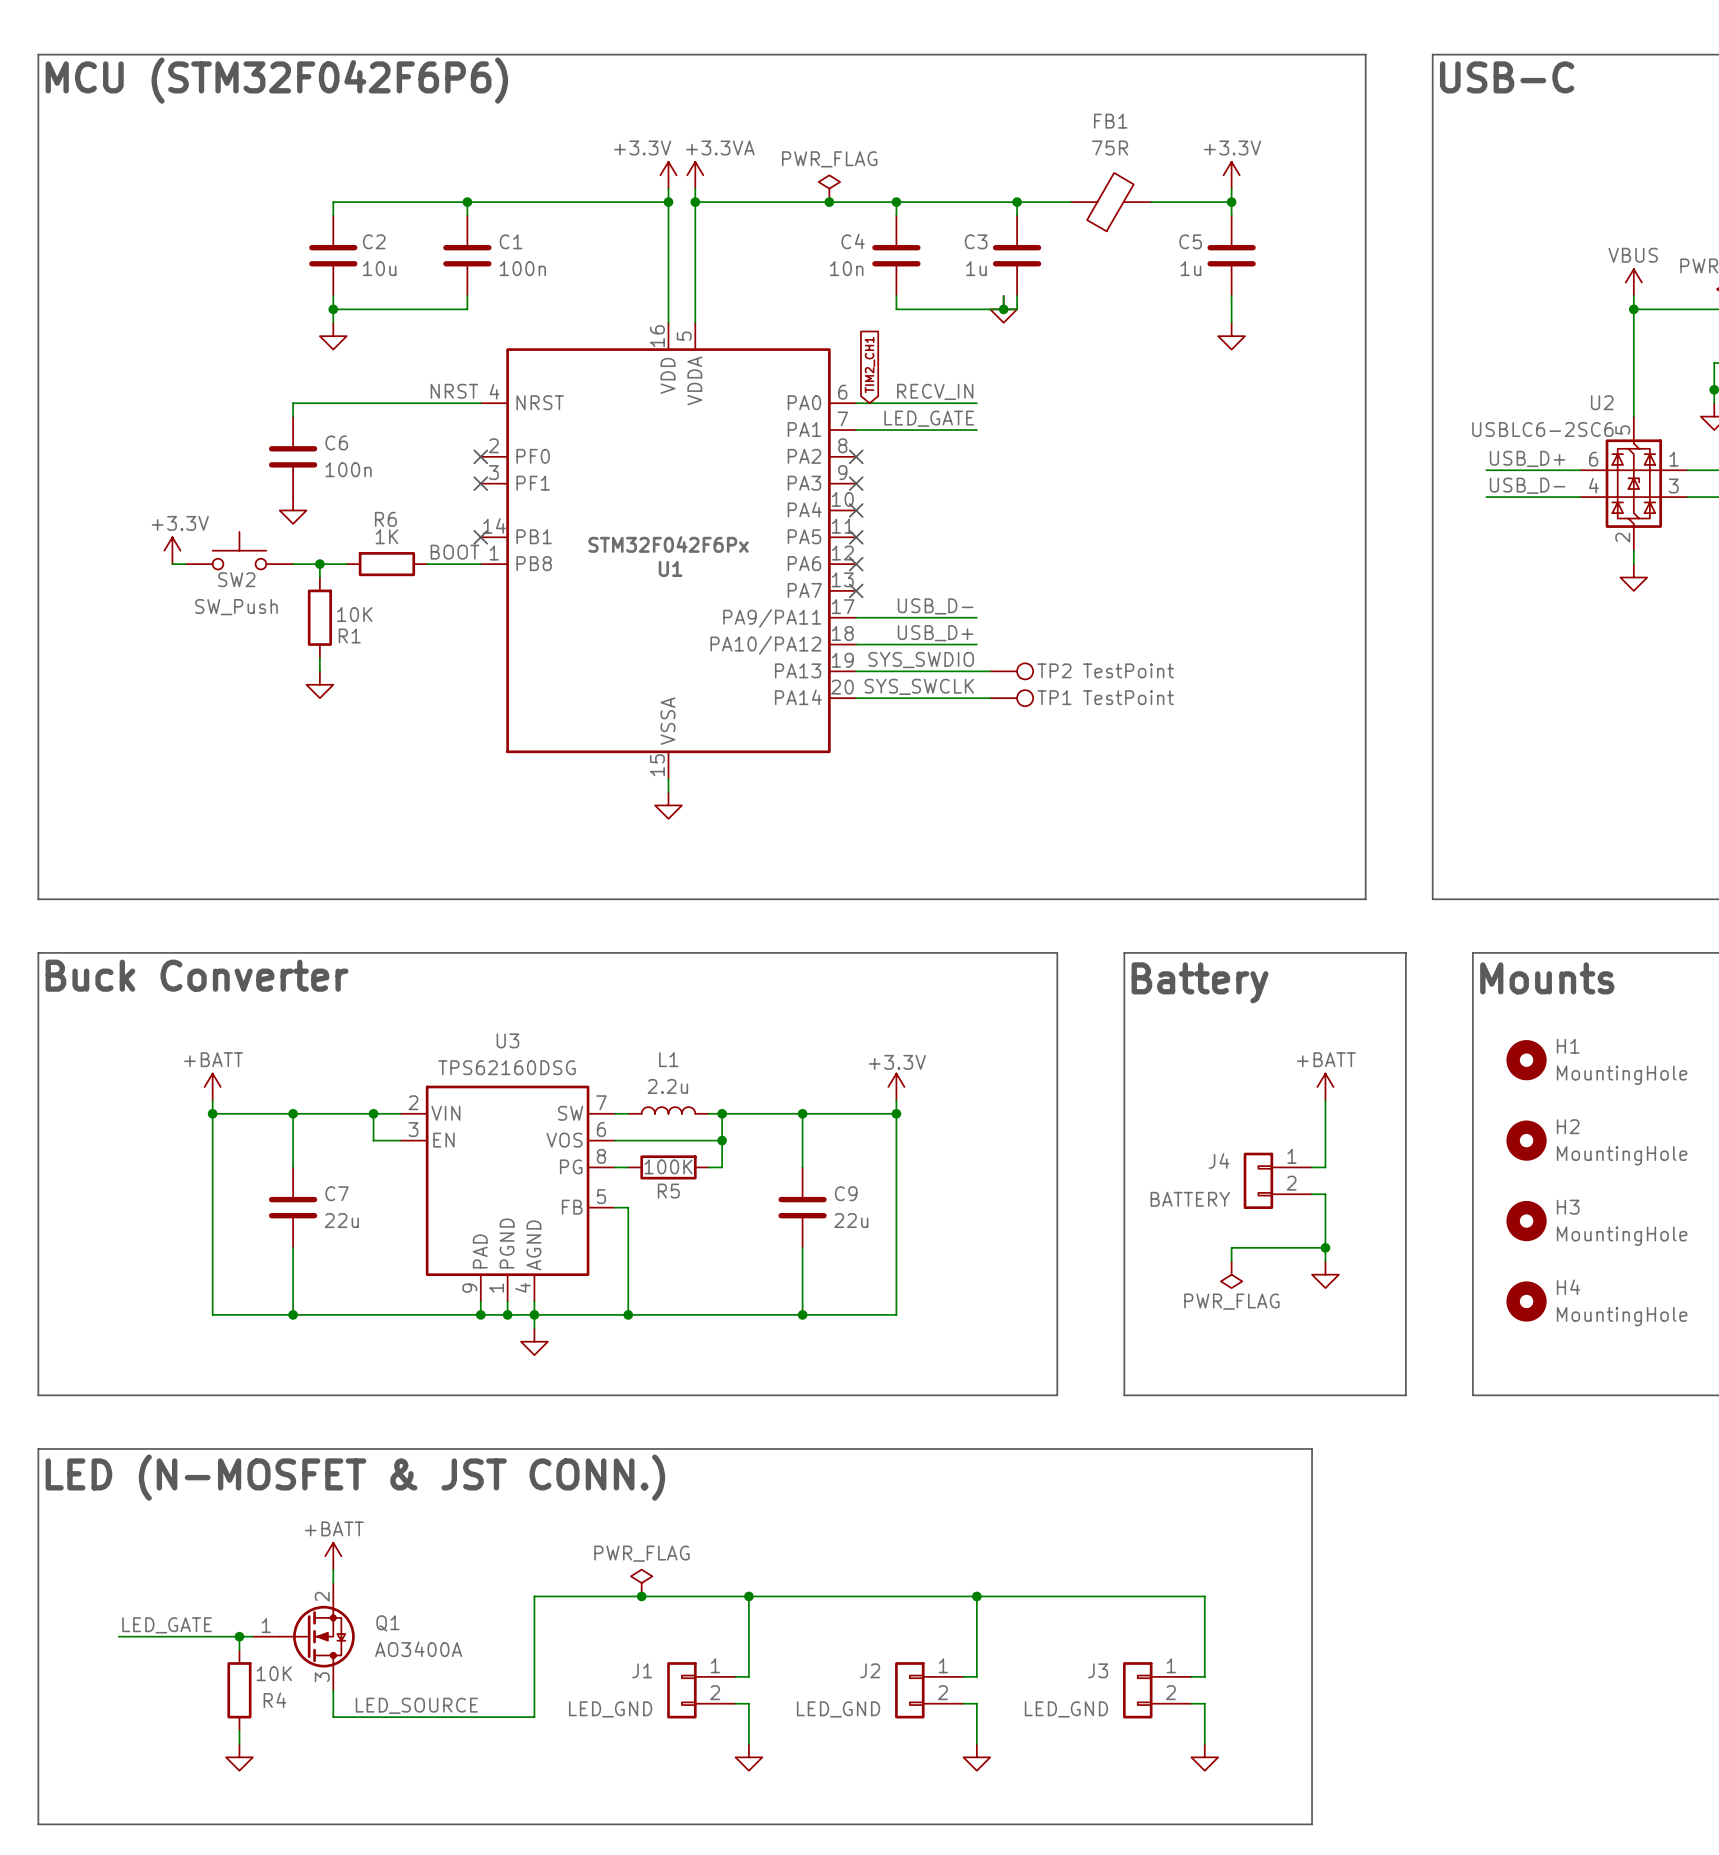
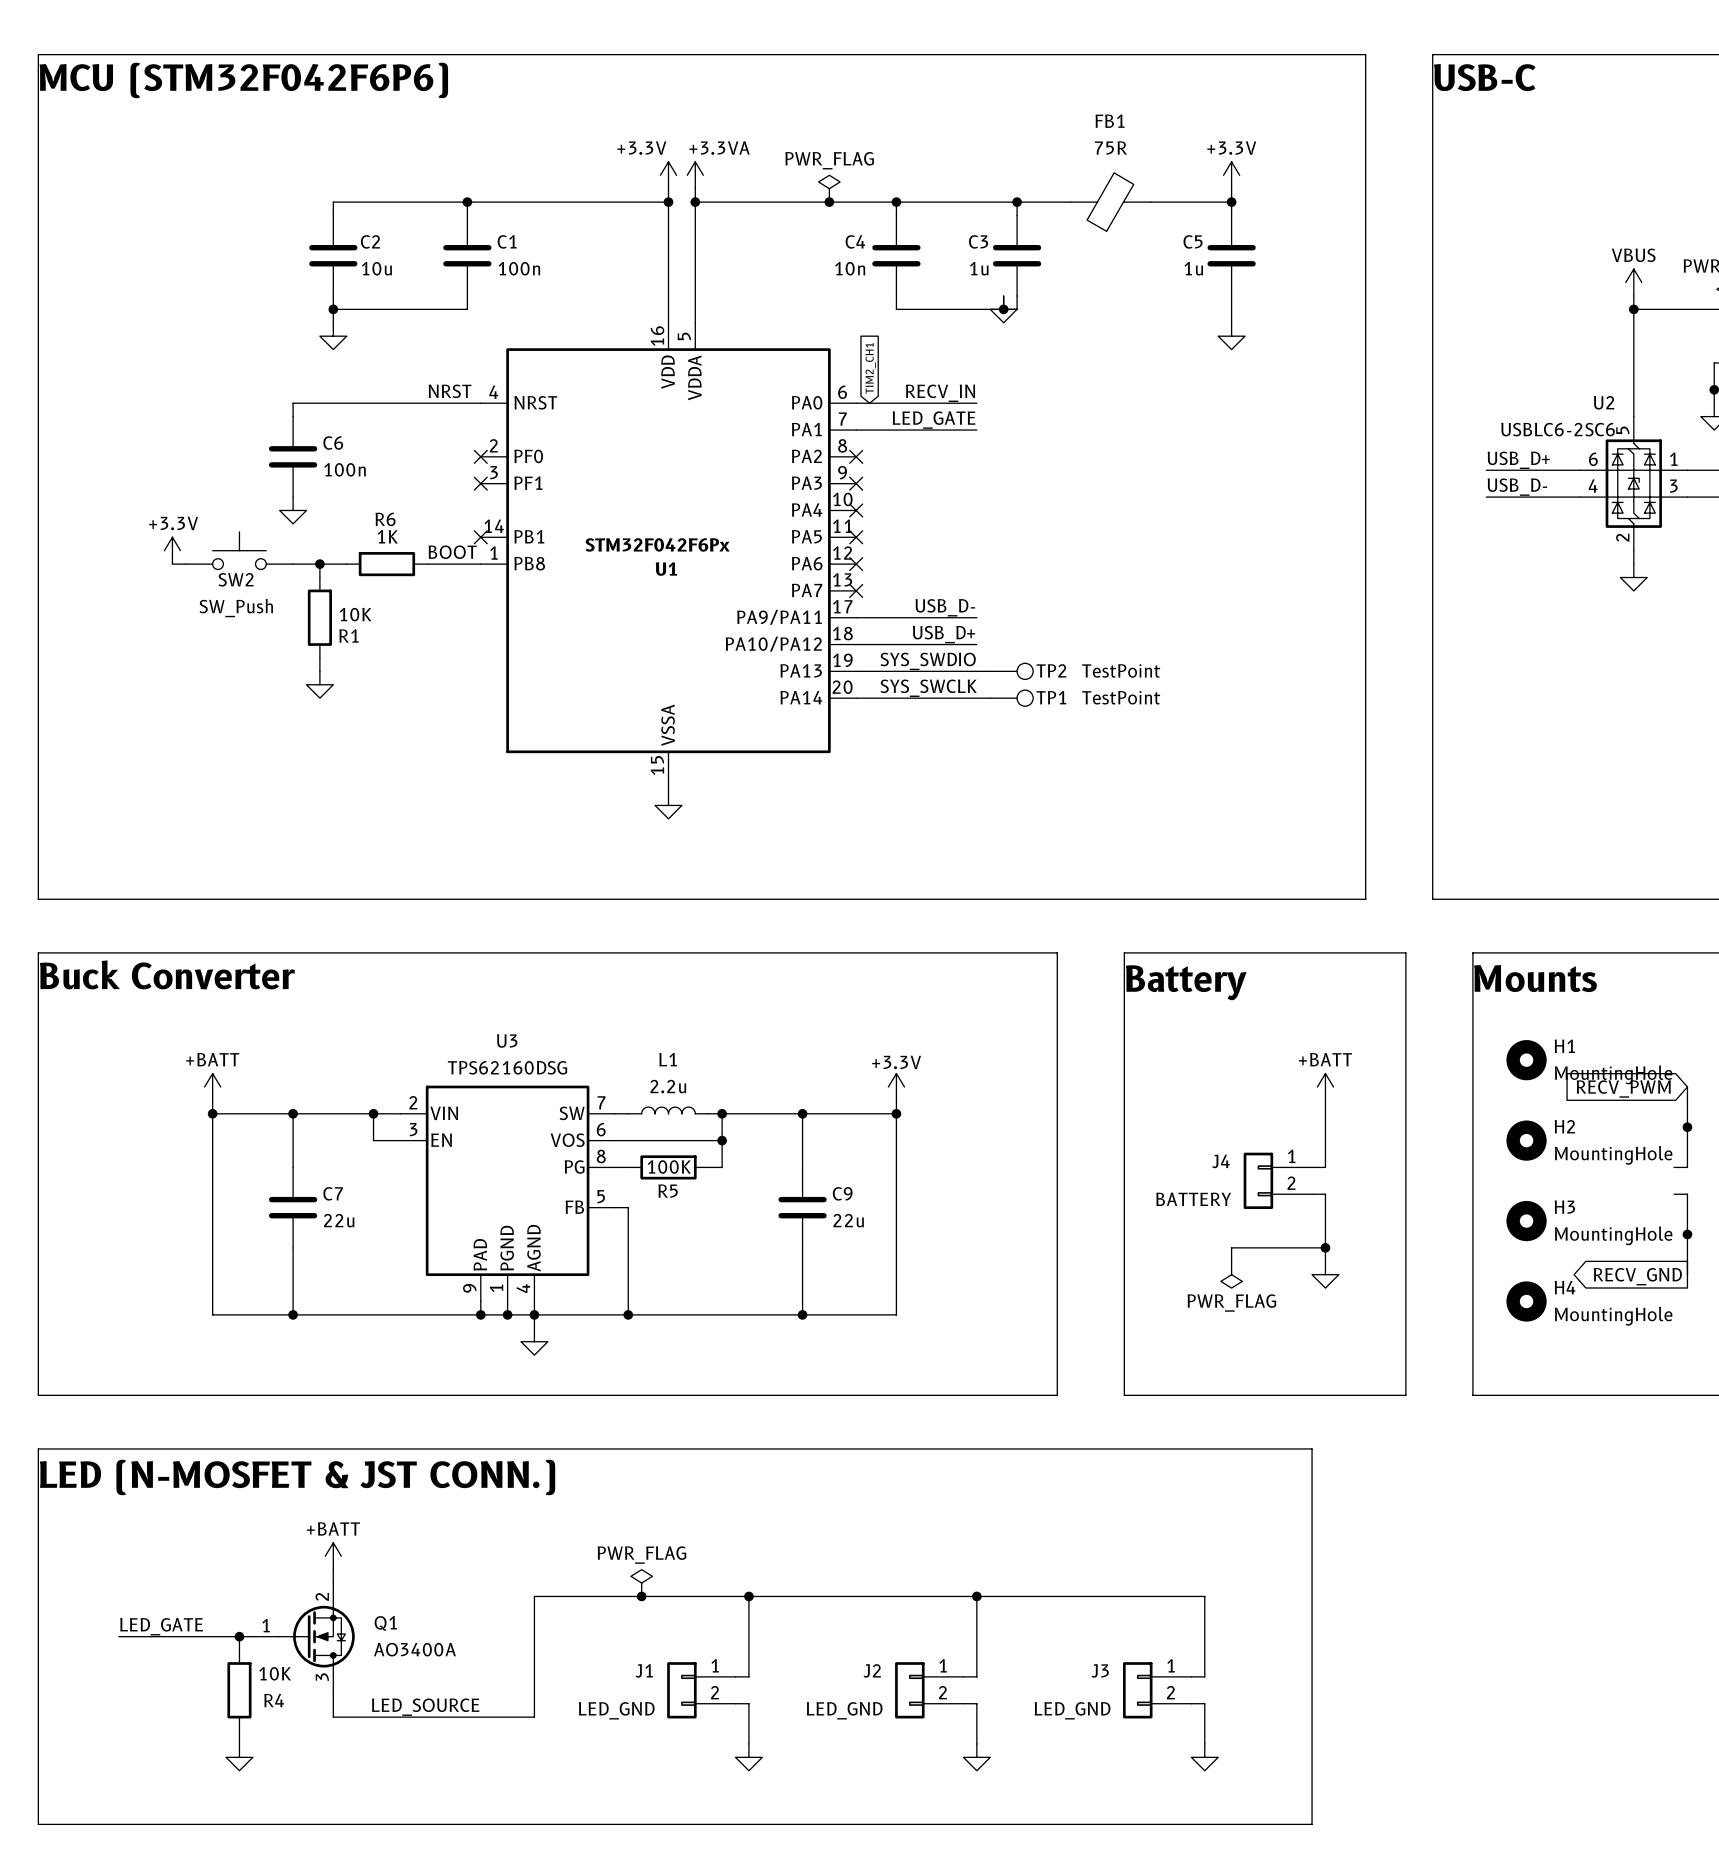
wire: none -> (1687, 1086) (1687, 1167) (1674, 1167)
global label: none -> RECV_PWM (1623, 1088)
junction: none -> (1687, 1127)
wire: none -> (1674, 1194) (1687, 1194) (1687, 1274)
junction: none -> (1687, 1234)
global label: none -> RECV_GND (1637, 1276)

